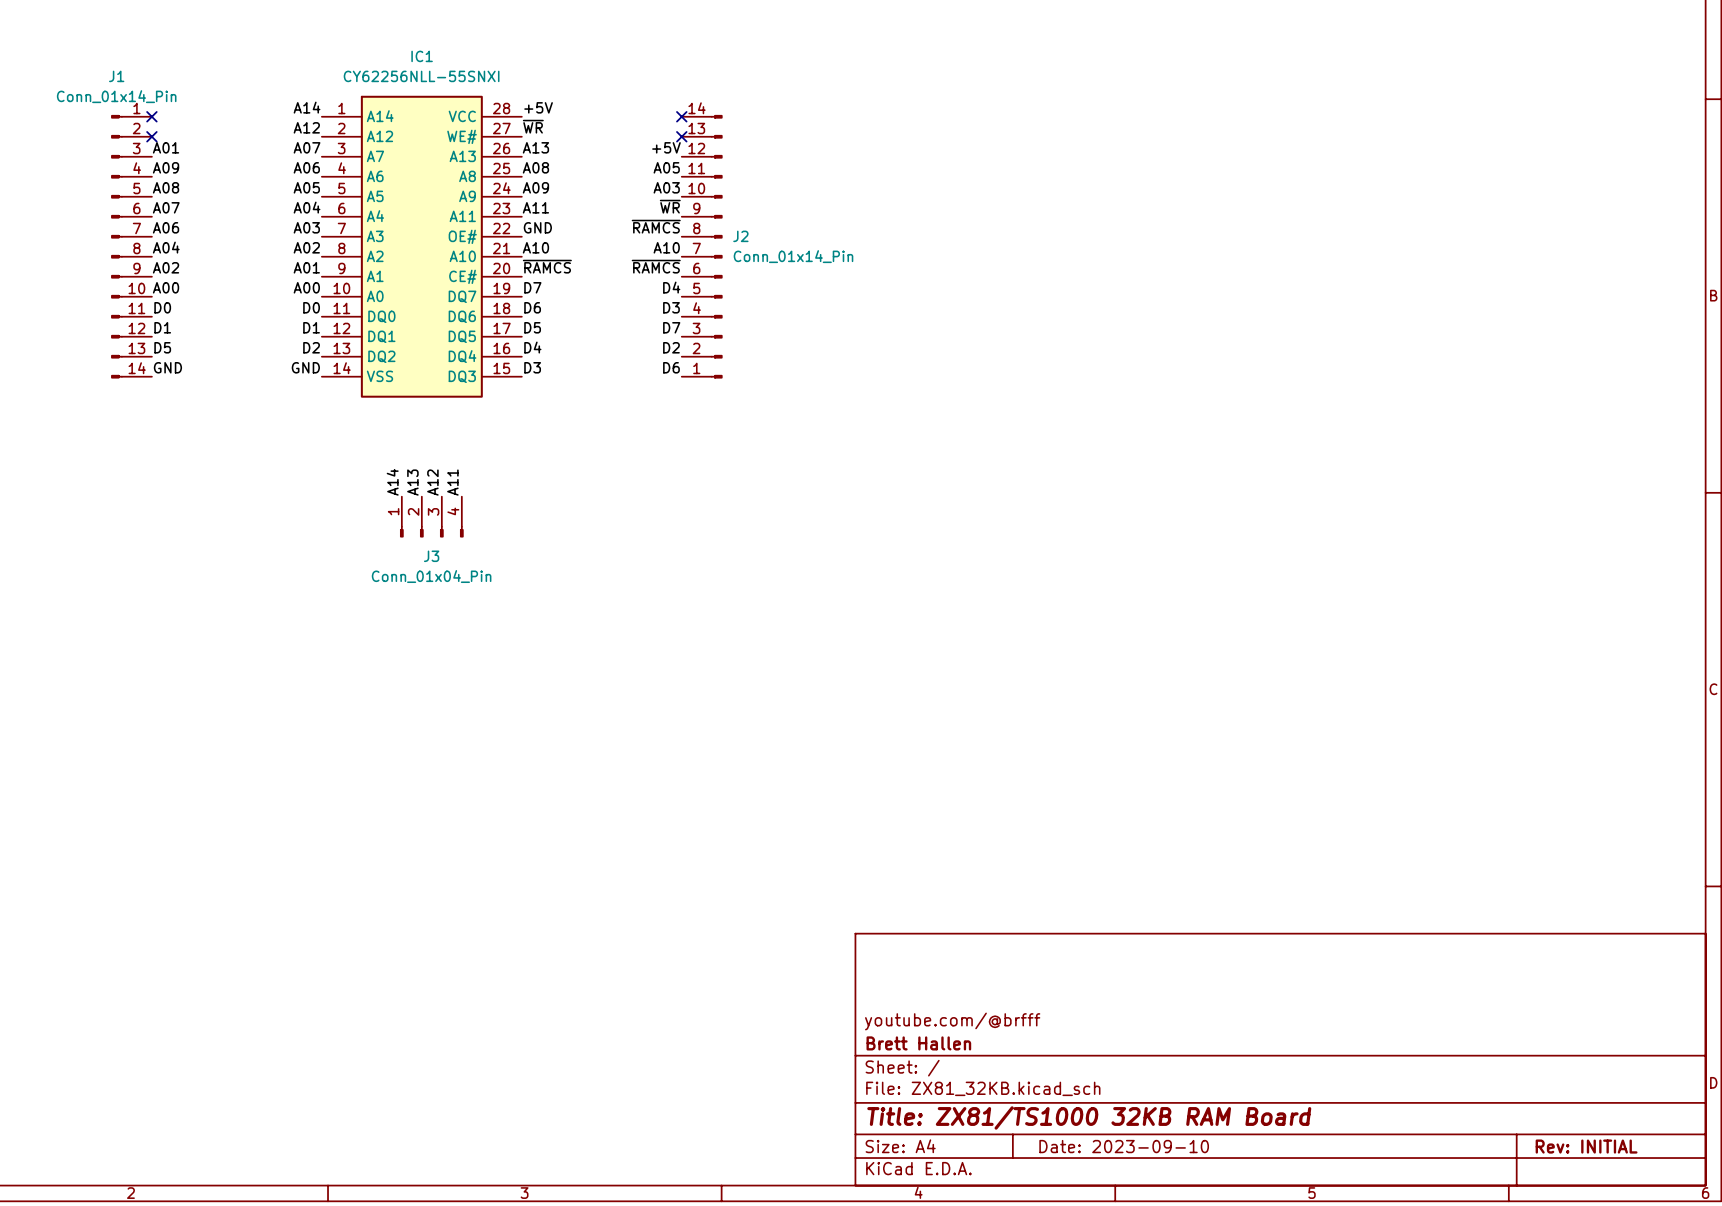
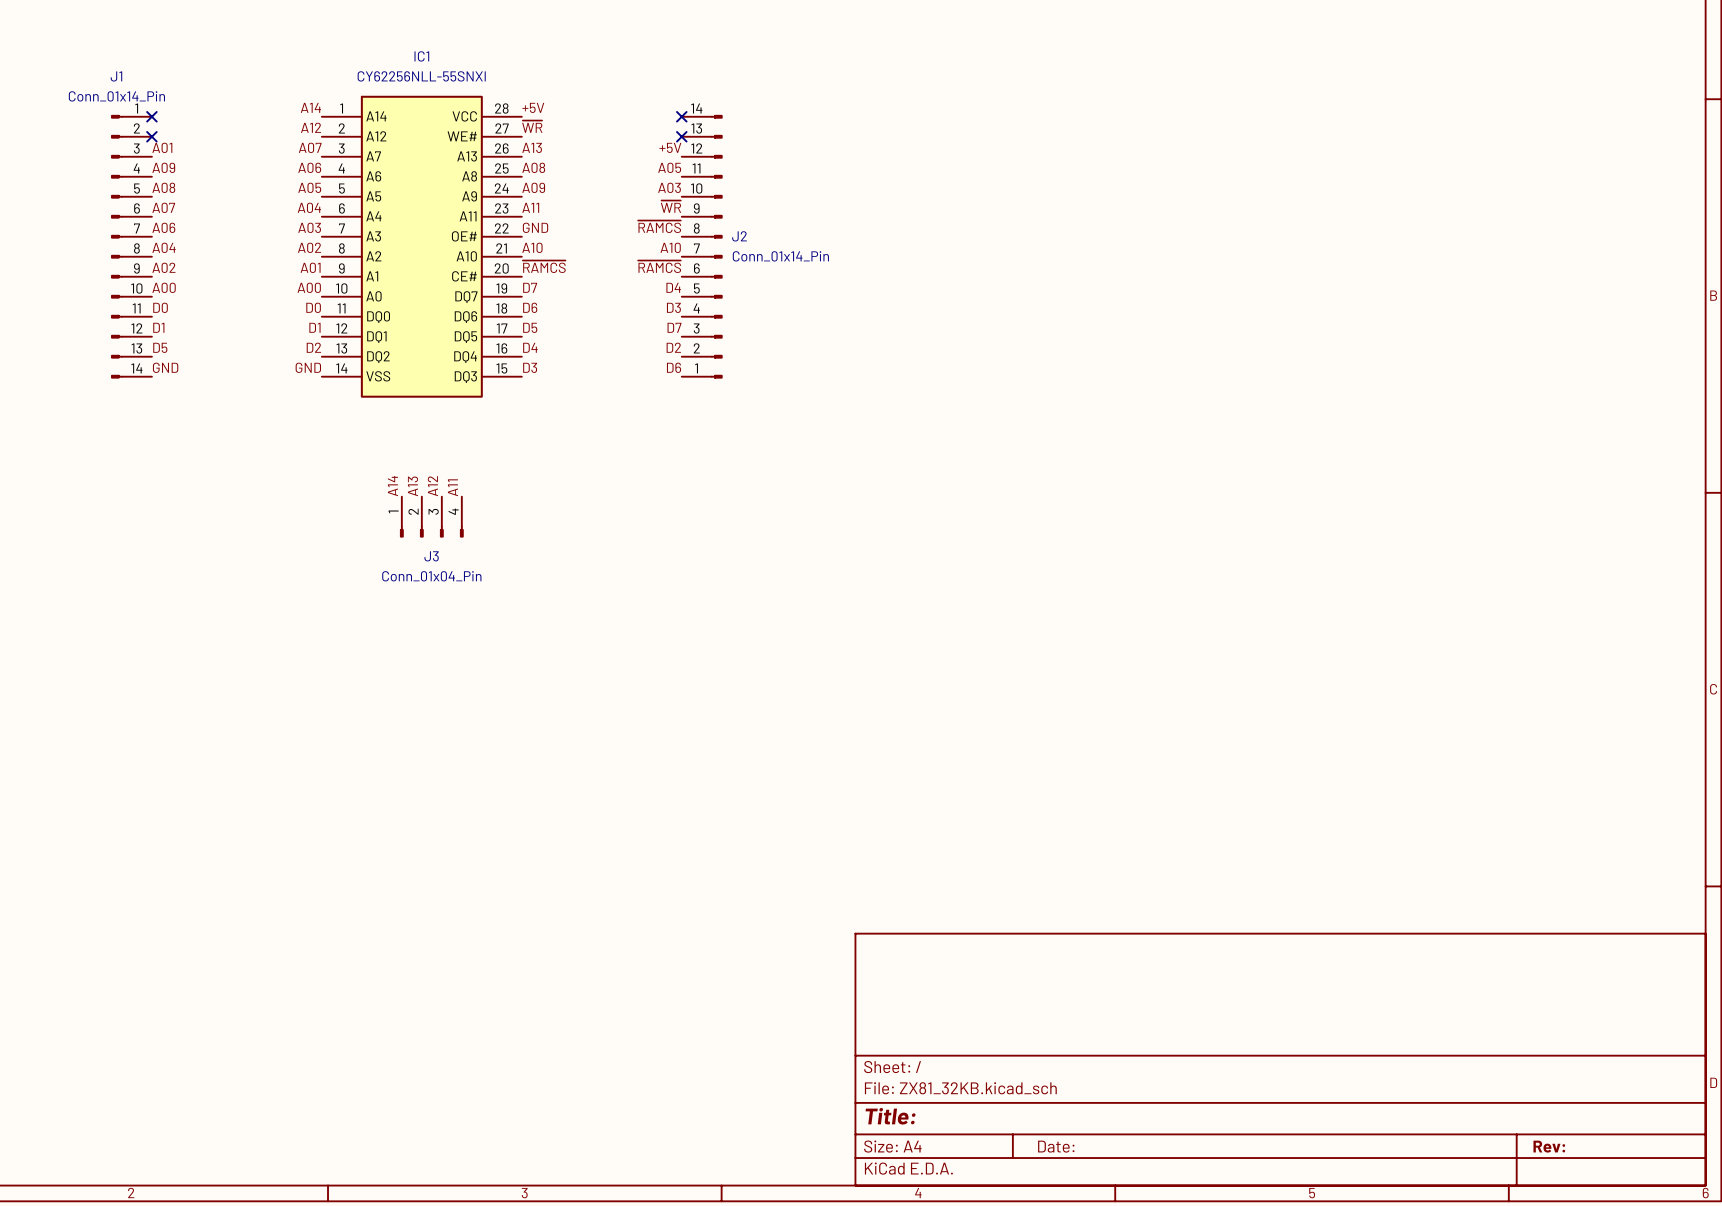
title block: youtube.com/@brfff (952, 1021) -> none
title block: Brett Hallen (918, 1043) -> none
title block: Title: ZX81/TS1000 32KB RAM Board (1089, 1117) -> Title: (890, 1116)
title block: Date: 2023-09-10 (1124, 1146) -> Date: (1056, 1146)
title block: Rev: INITIAL (1586, 1146) -> Rev: (1549, 1146)

